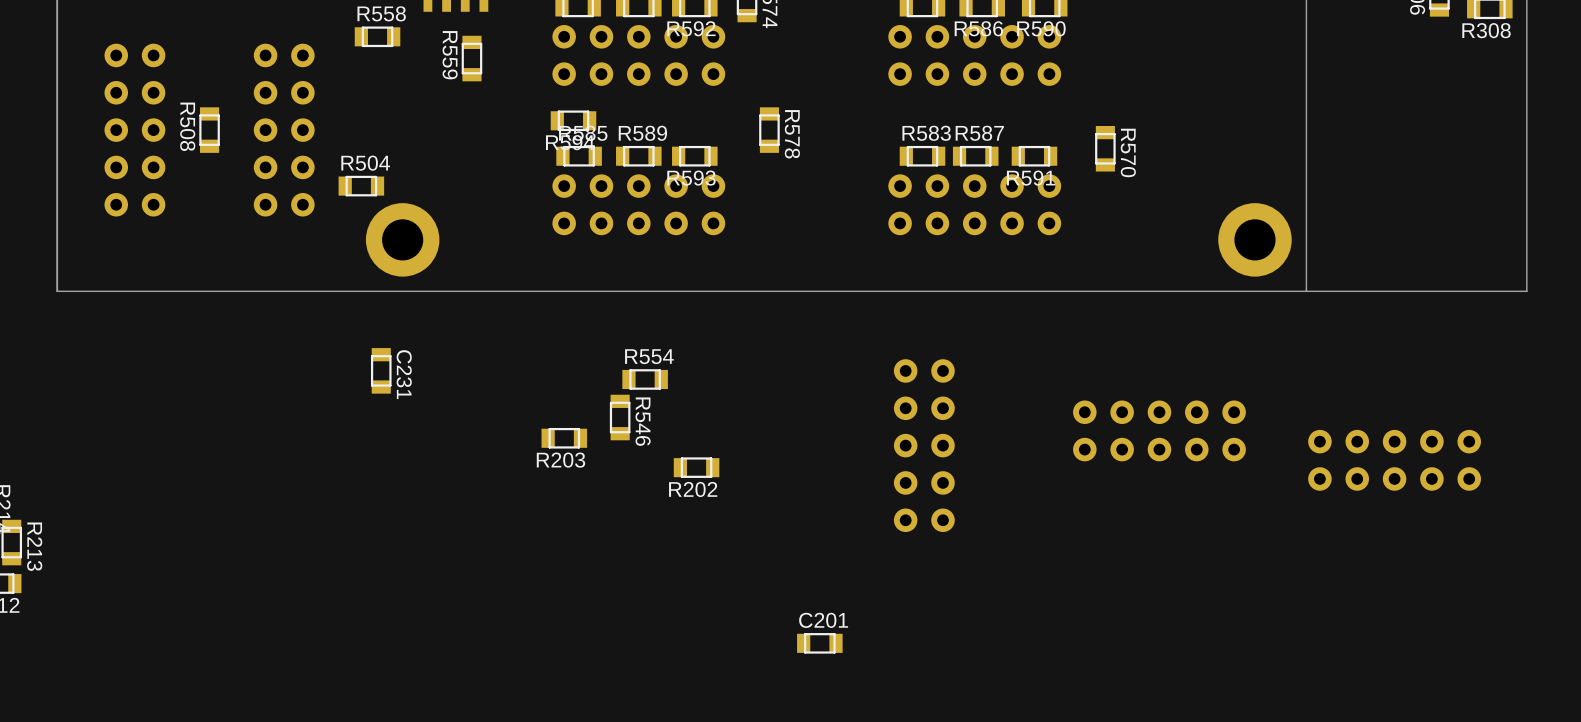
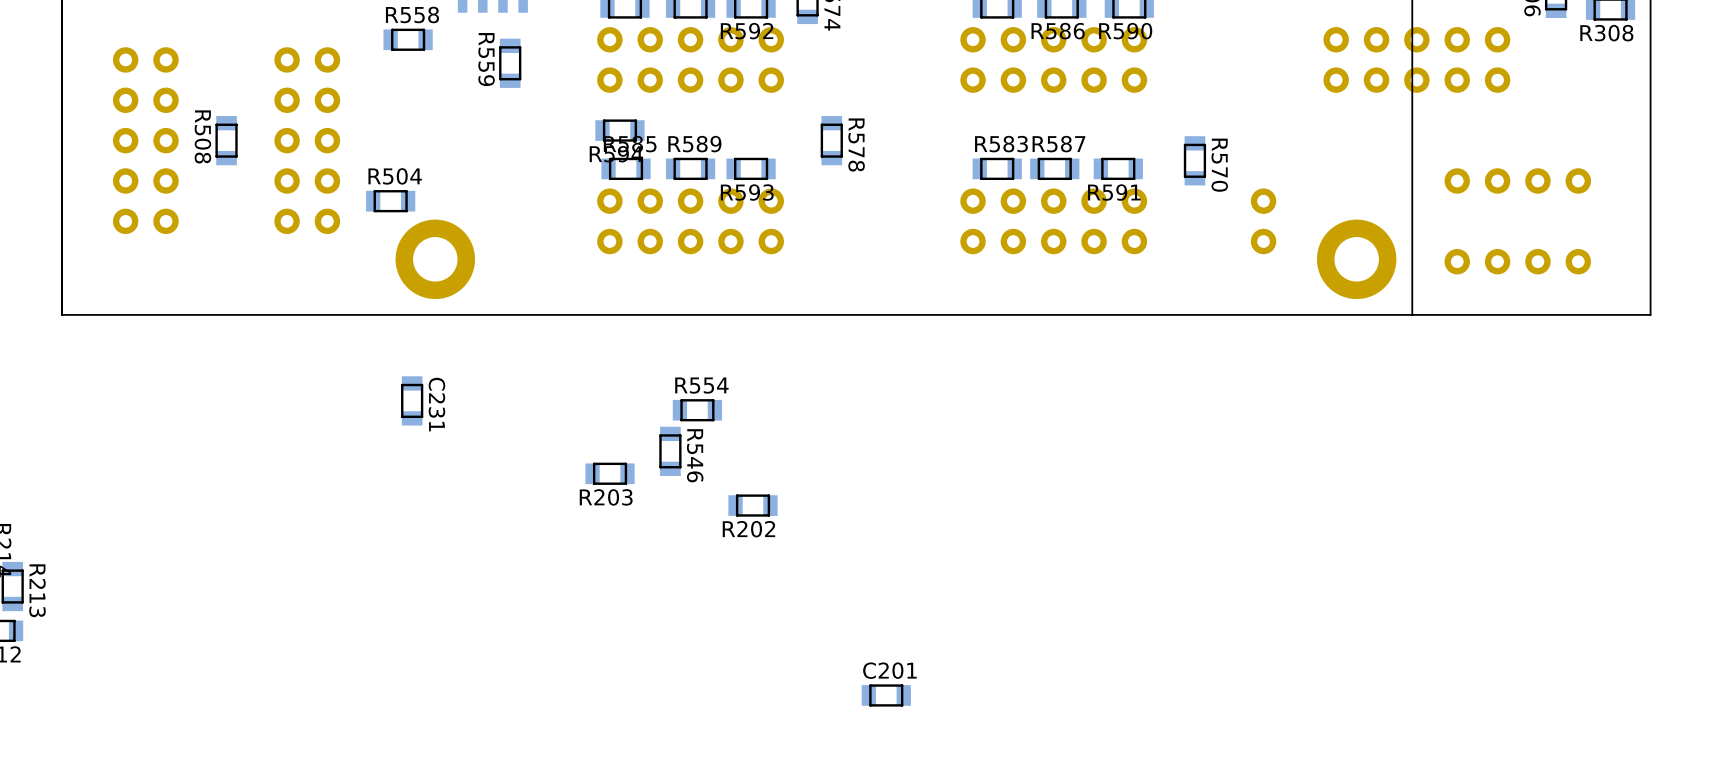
part: none -> (1416, 59)
part: none -> (1517, 181)
part: none -> (1263, 221)
part: none -> (1517, 261)
part: (1159, 430) -> none
part: (924, 445) -> none
part: (1394, 460) -> none

